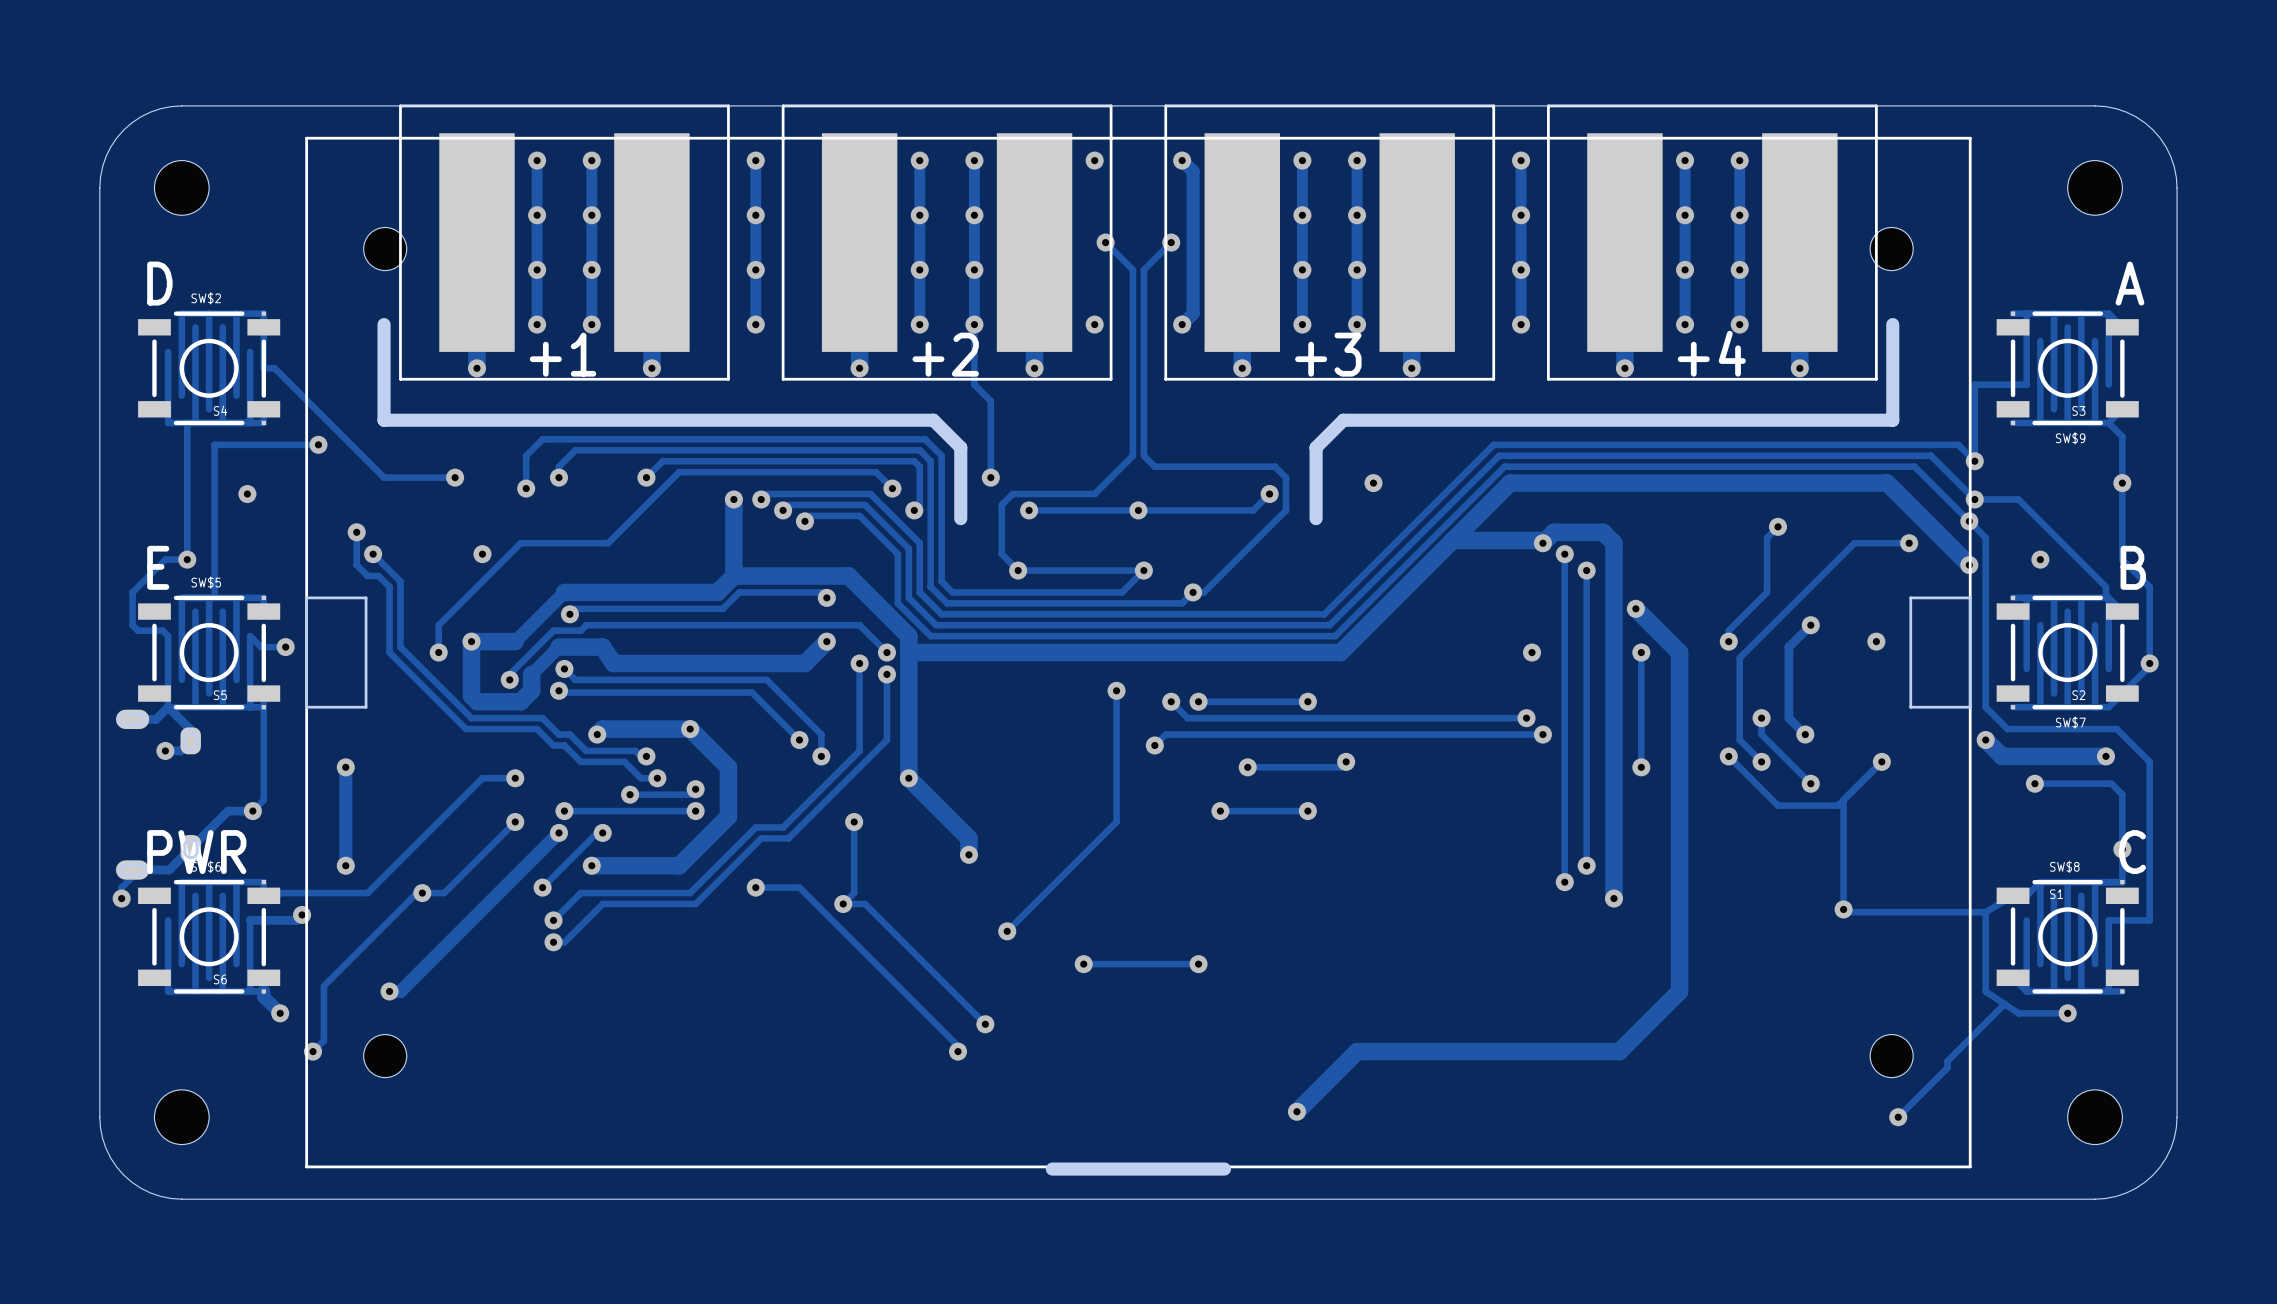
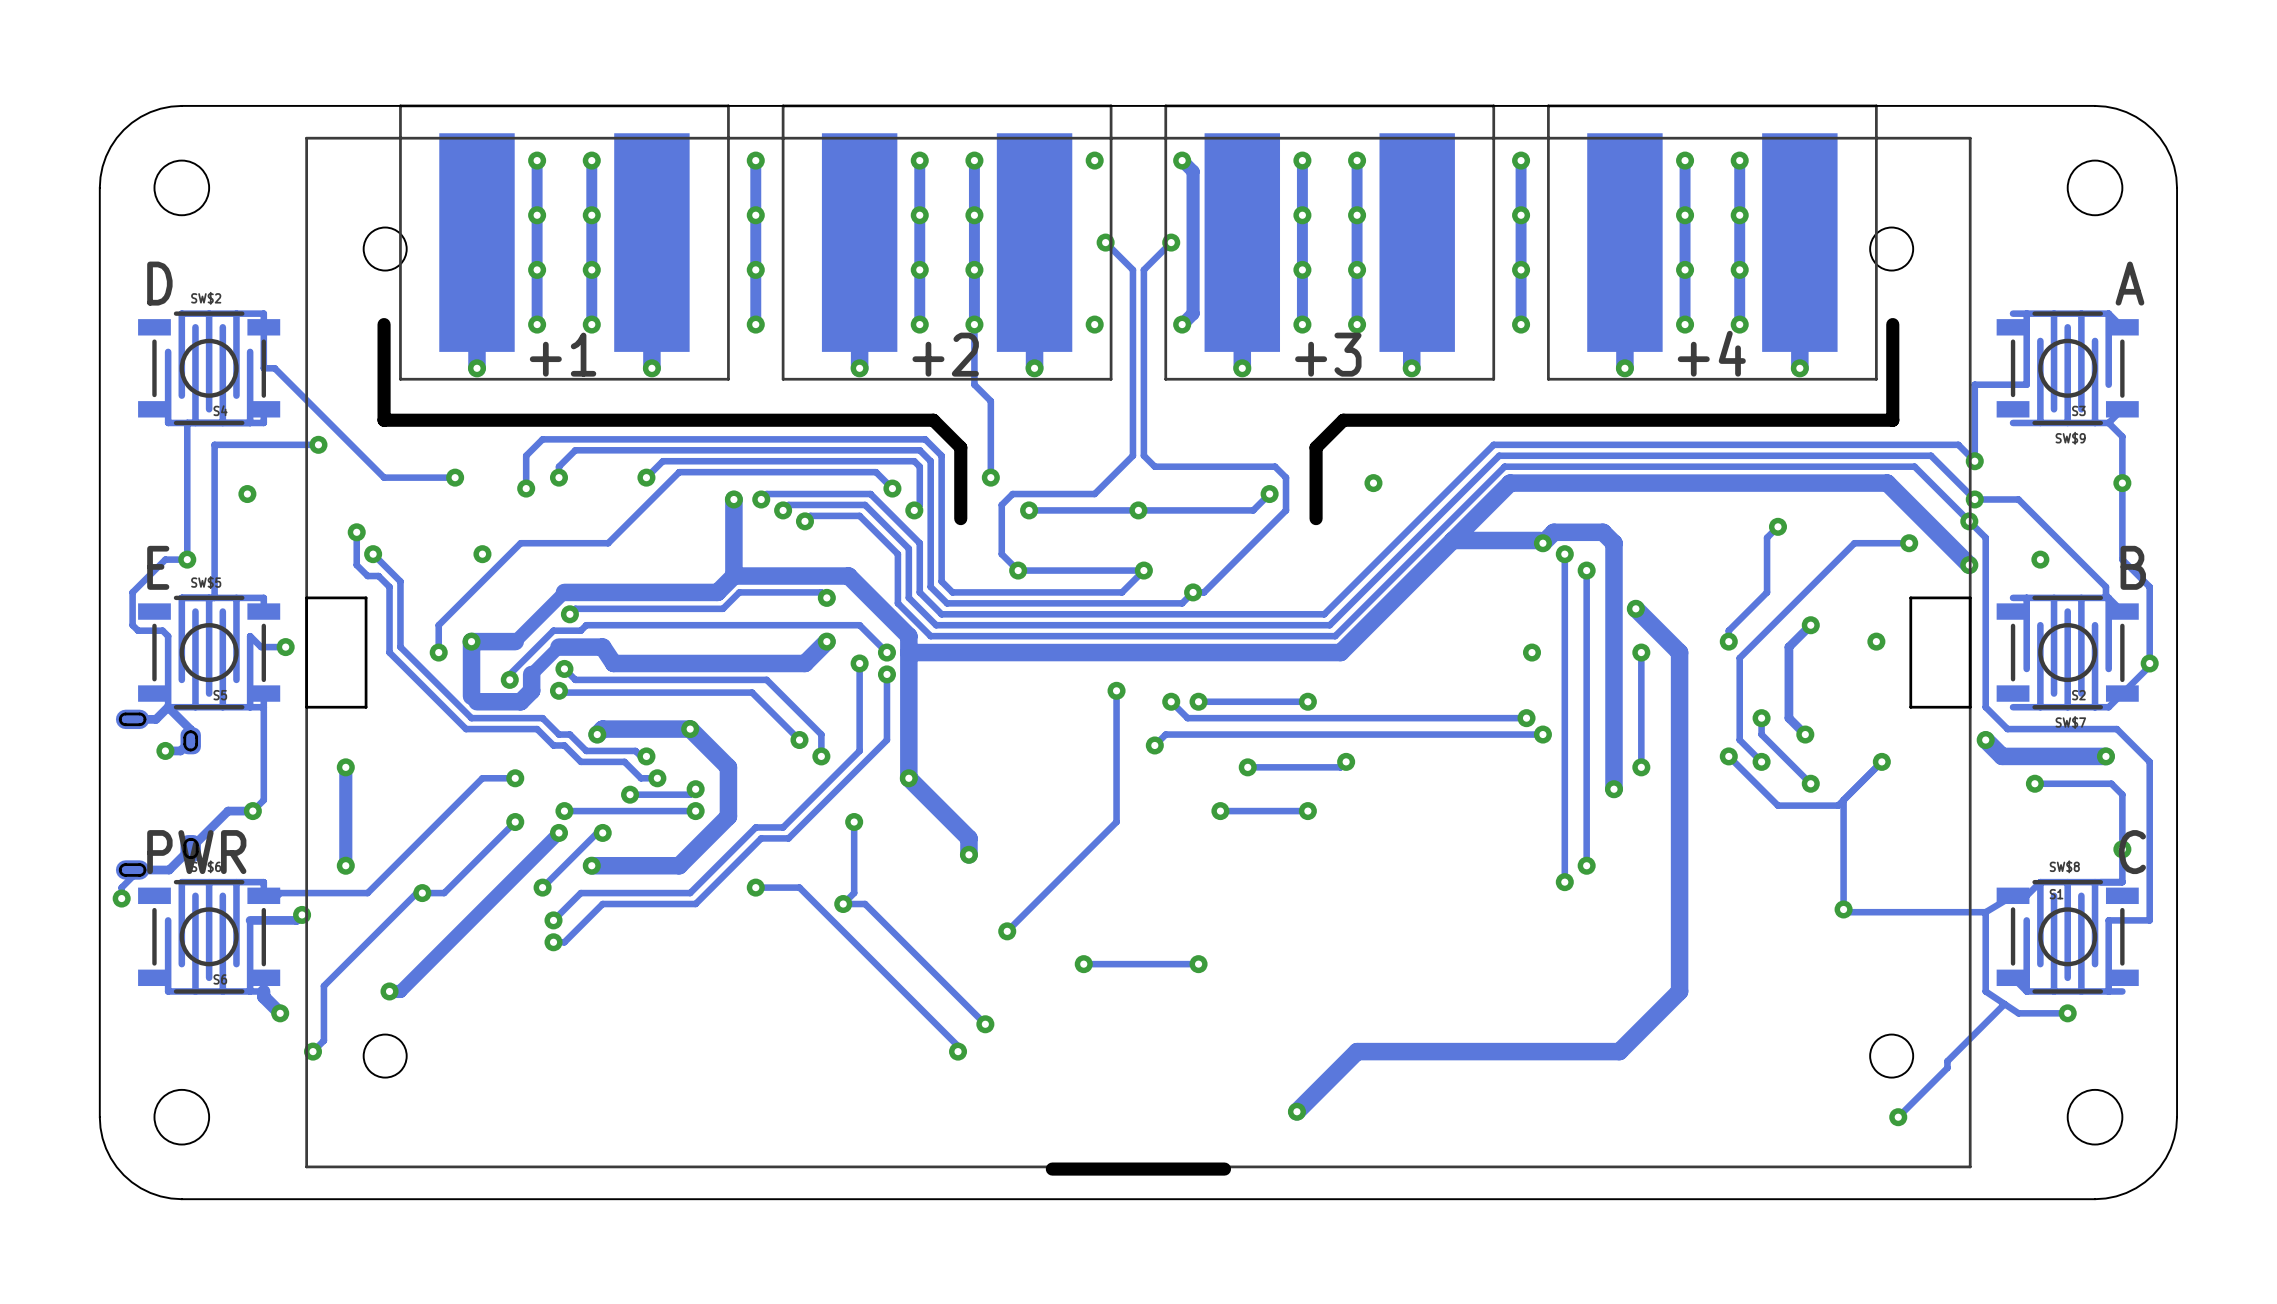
track: (1613, 789) (1613, 898) -> none
via position: (1613, 898) -> (1613, 789)

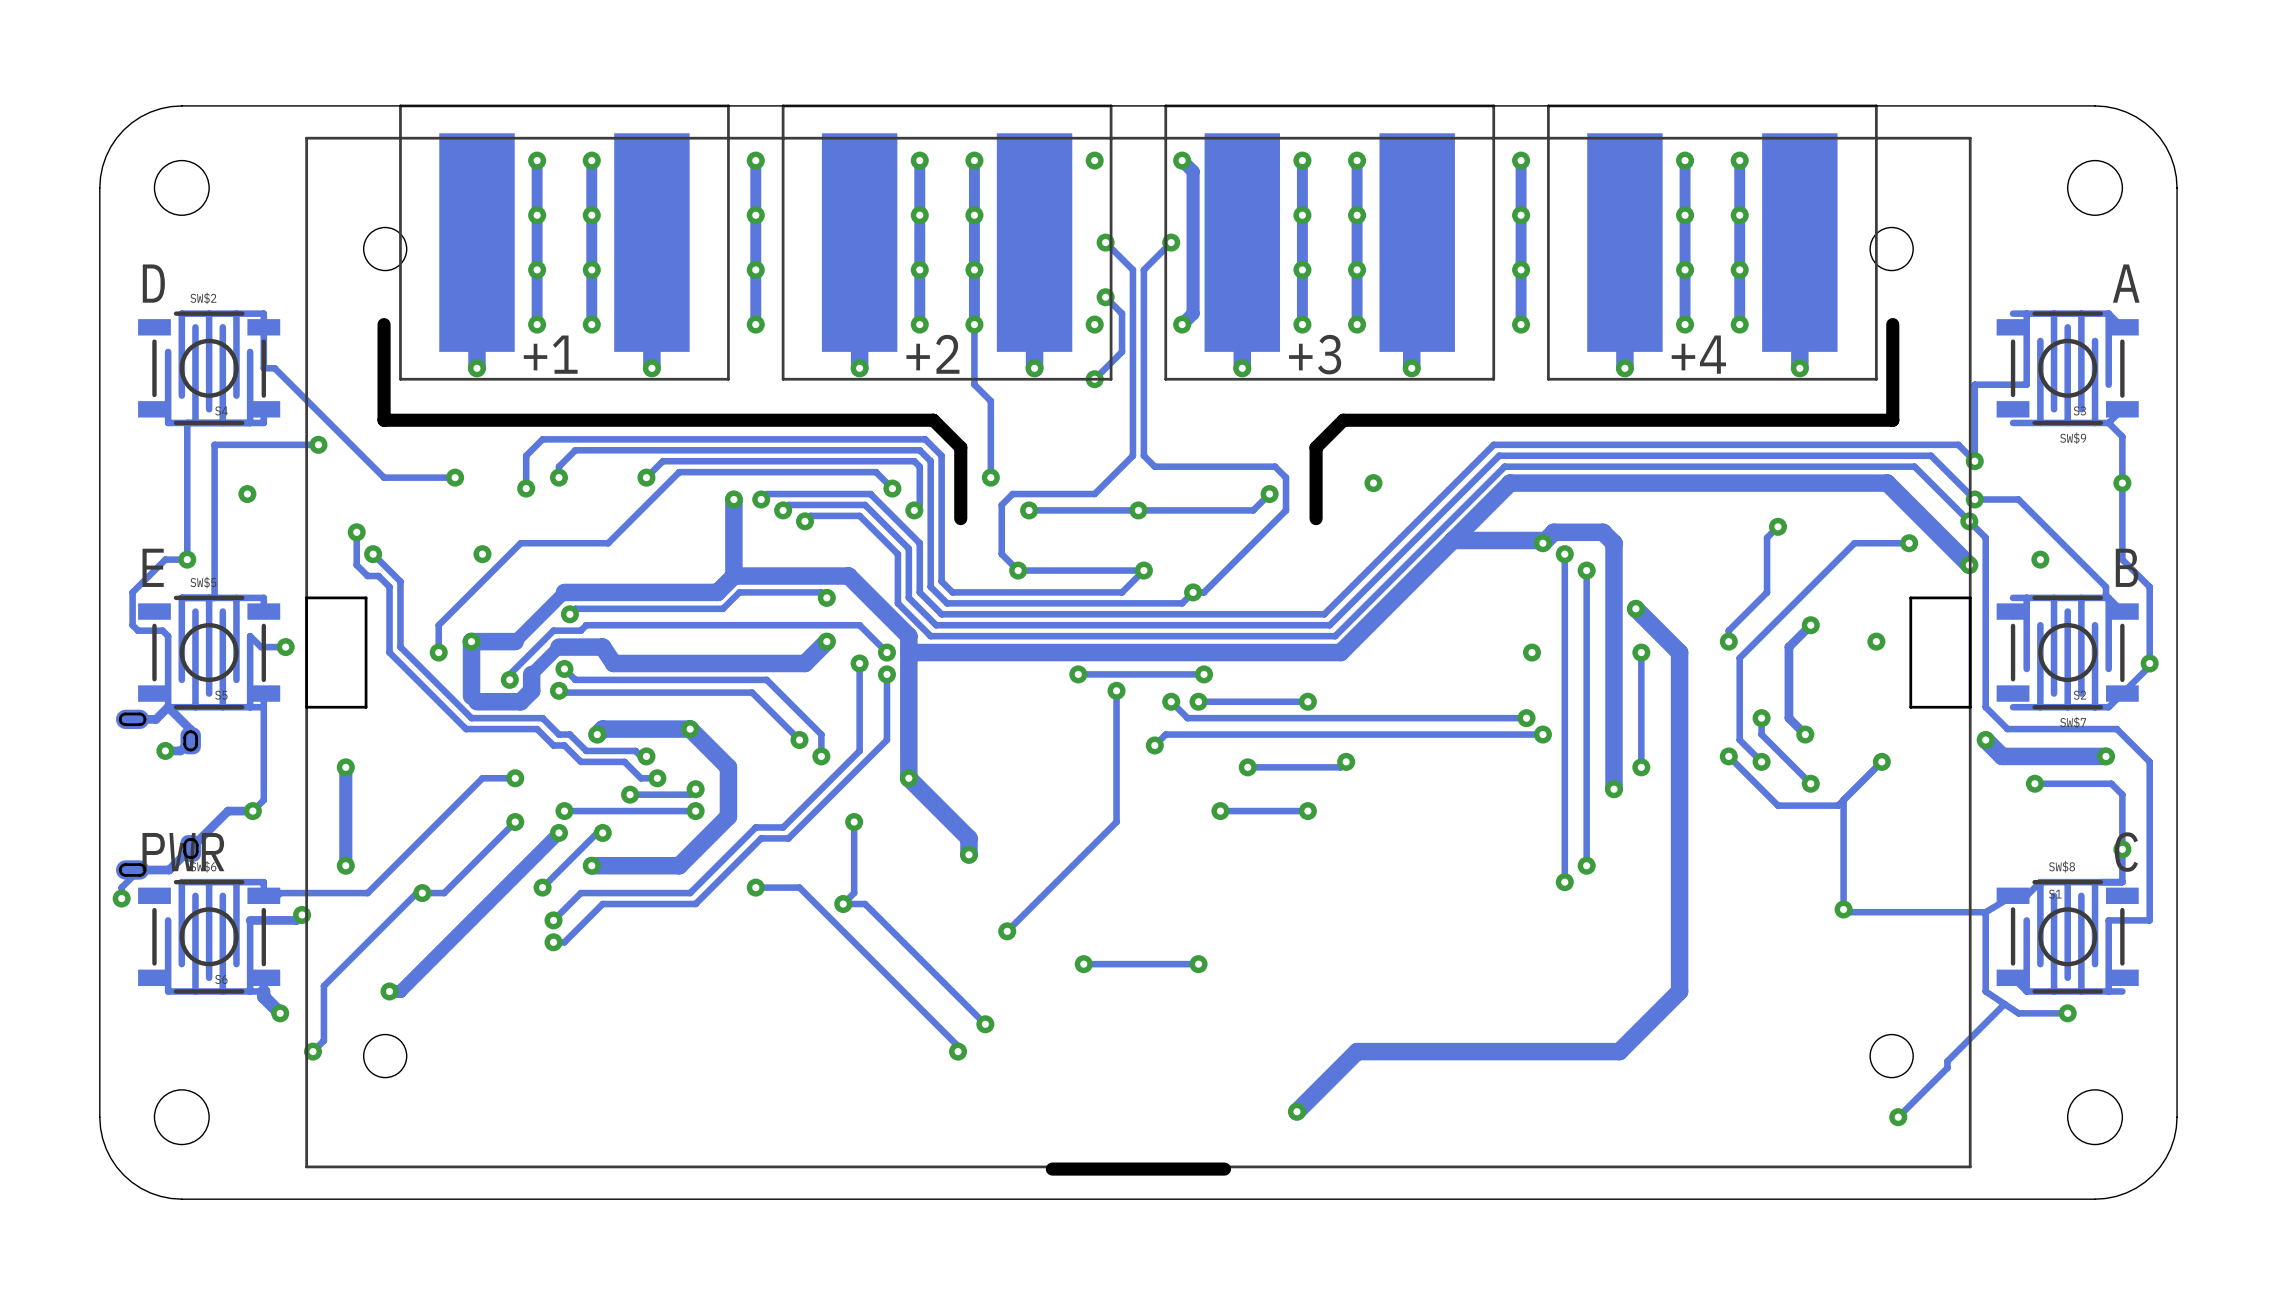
track: none -> (1105, 297) (1122, 313) (1122, 351) (1094, 379)
via: none -> (1105, 297)
via: none -> (1094, 379)
via: none -> (1078, 674)
track: none -> (1204, 674) (1078, 674)
via: none -> (1204, 674)

